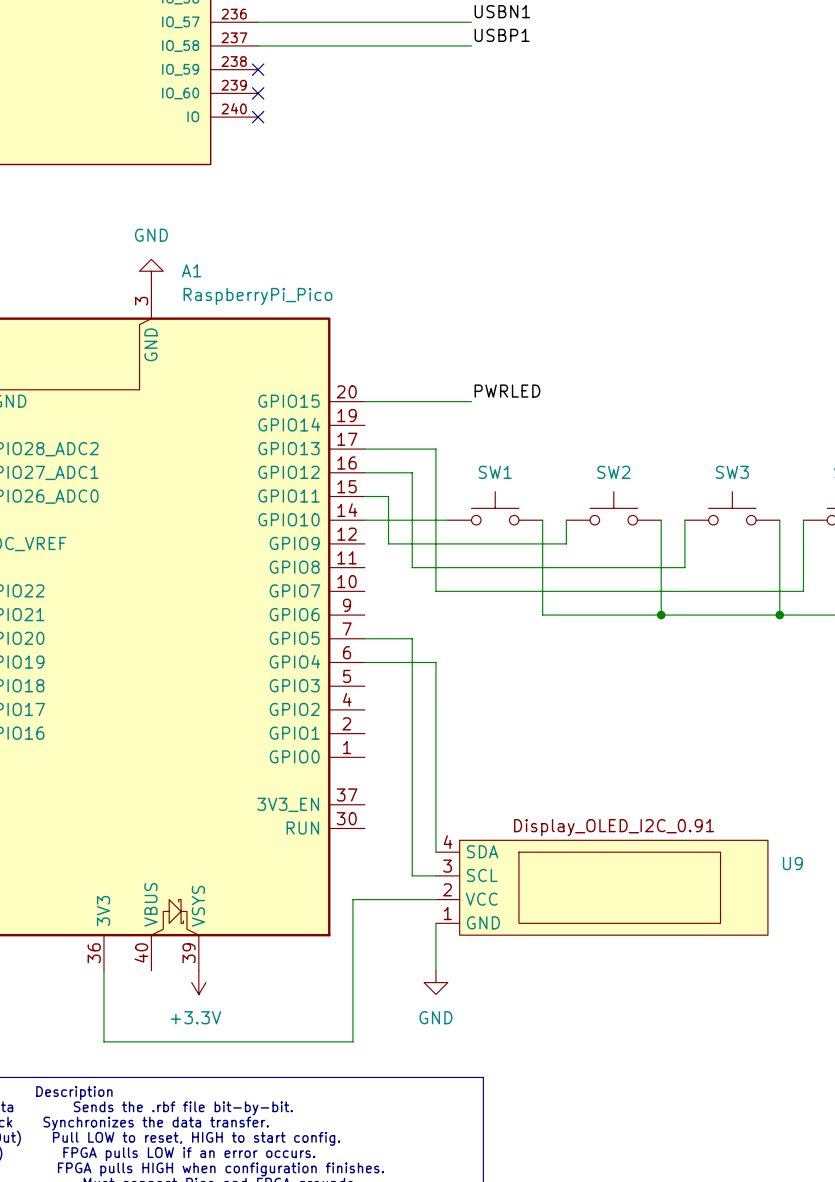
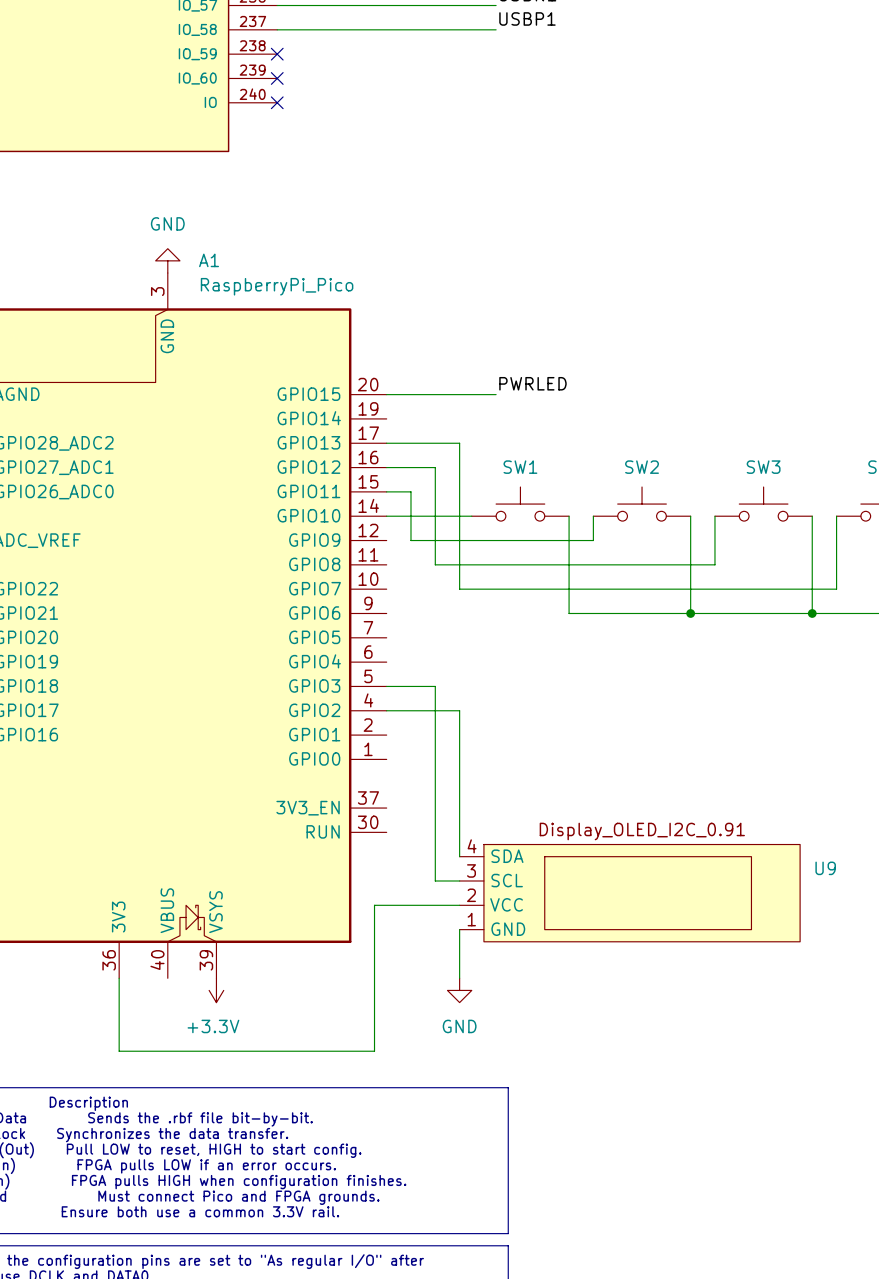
wire: (364, 638) (412, 638) (412, 686) -> (386, 686) (435, 686)
wire: (364, 662) (435, 662) (435, 709) -> (386, 710) (459, 710)

